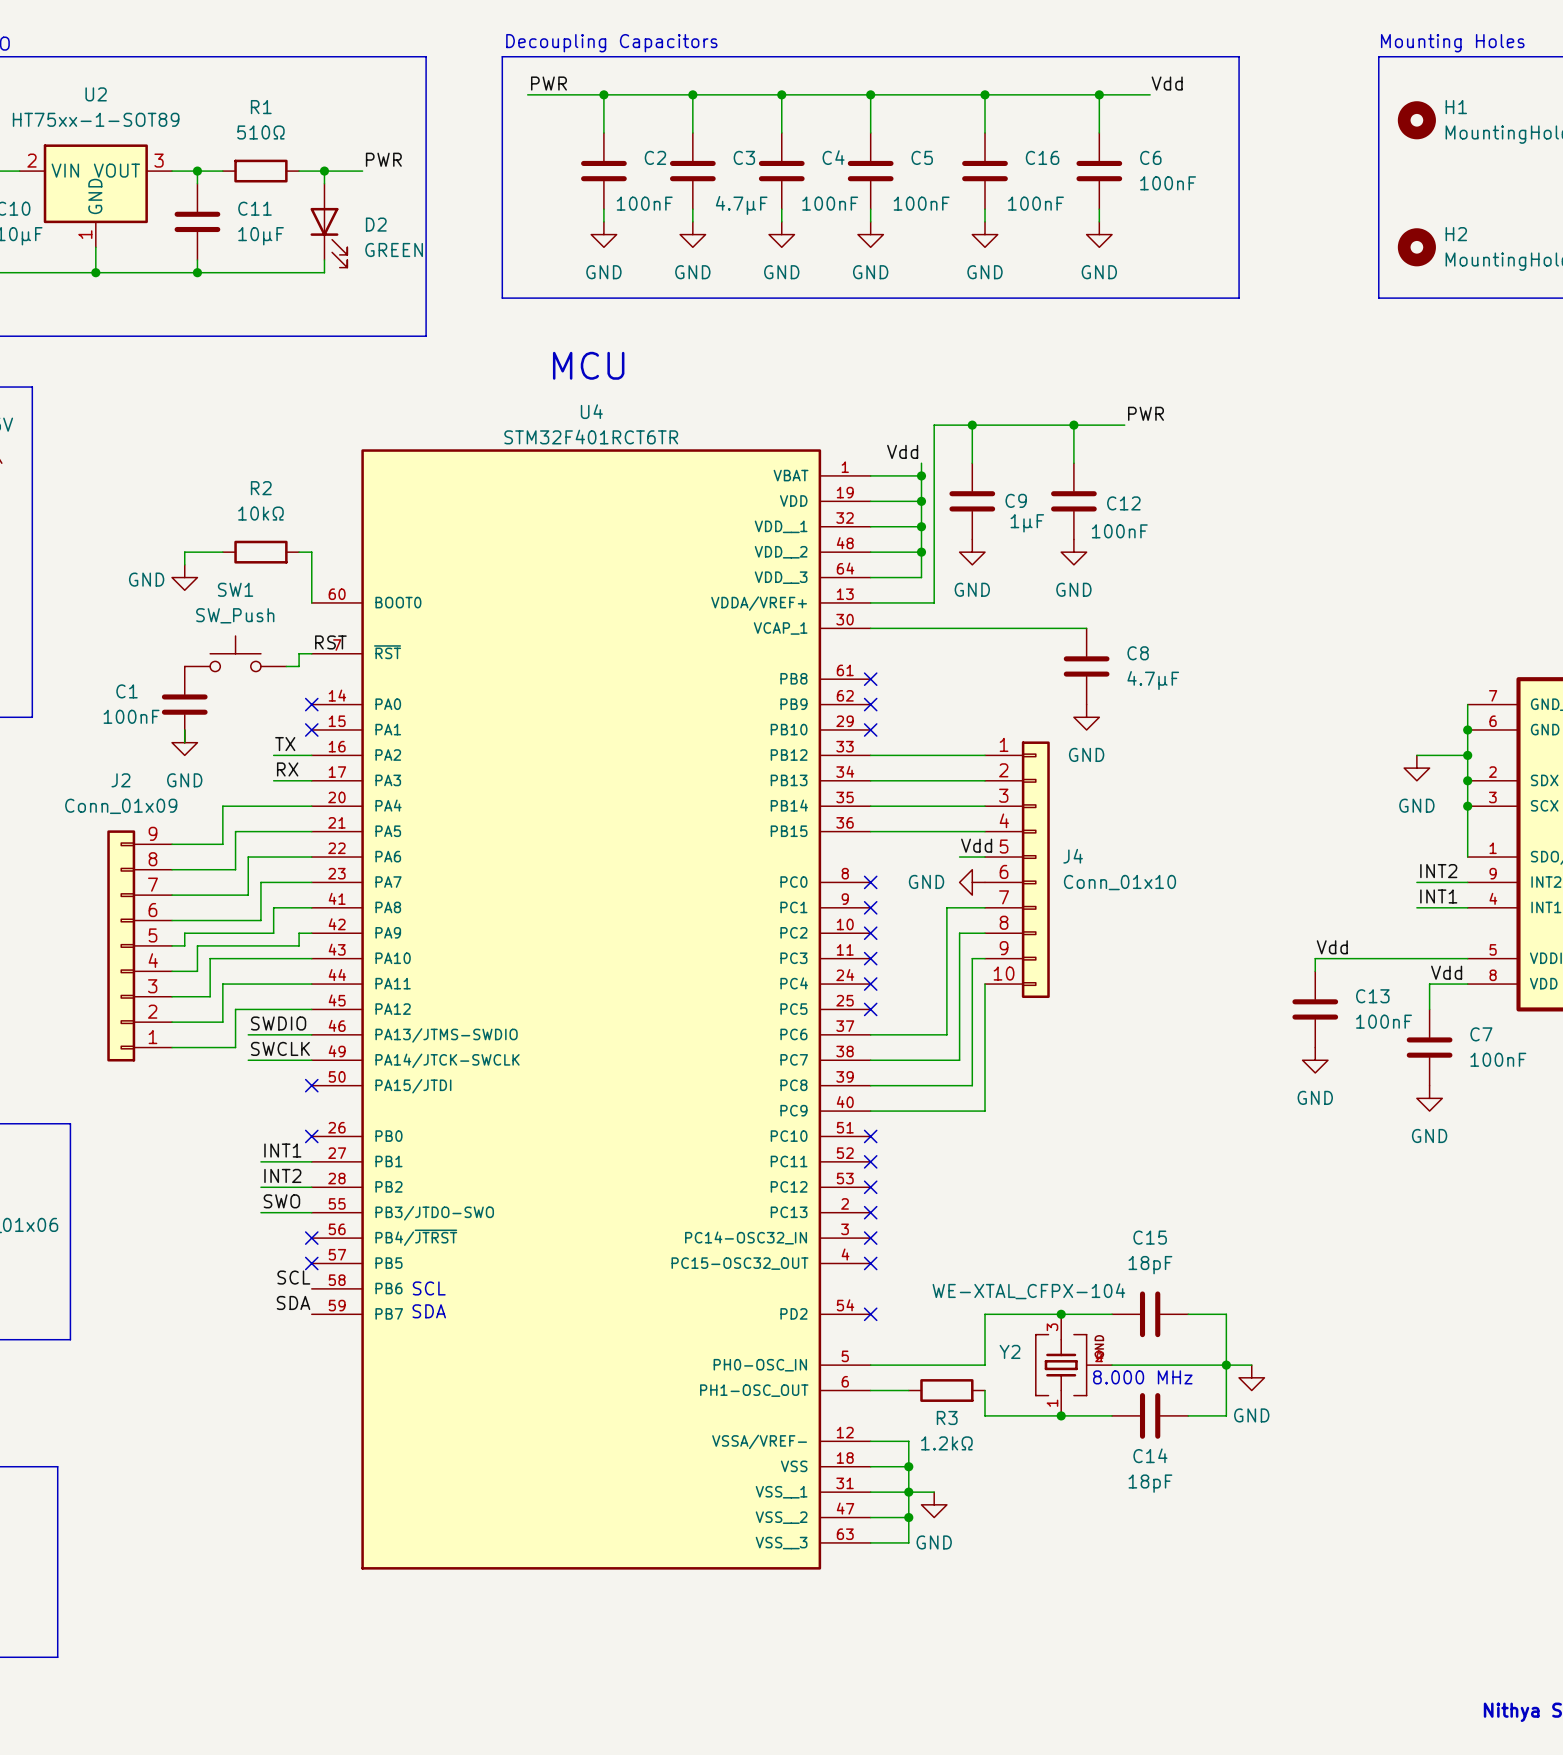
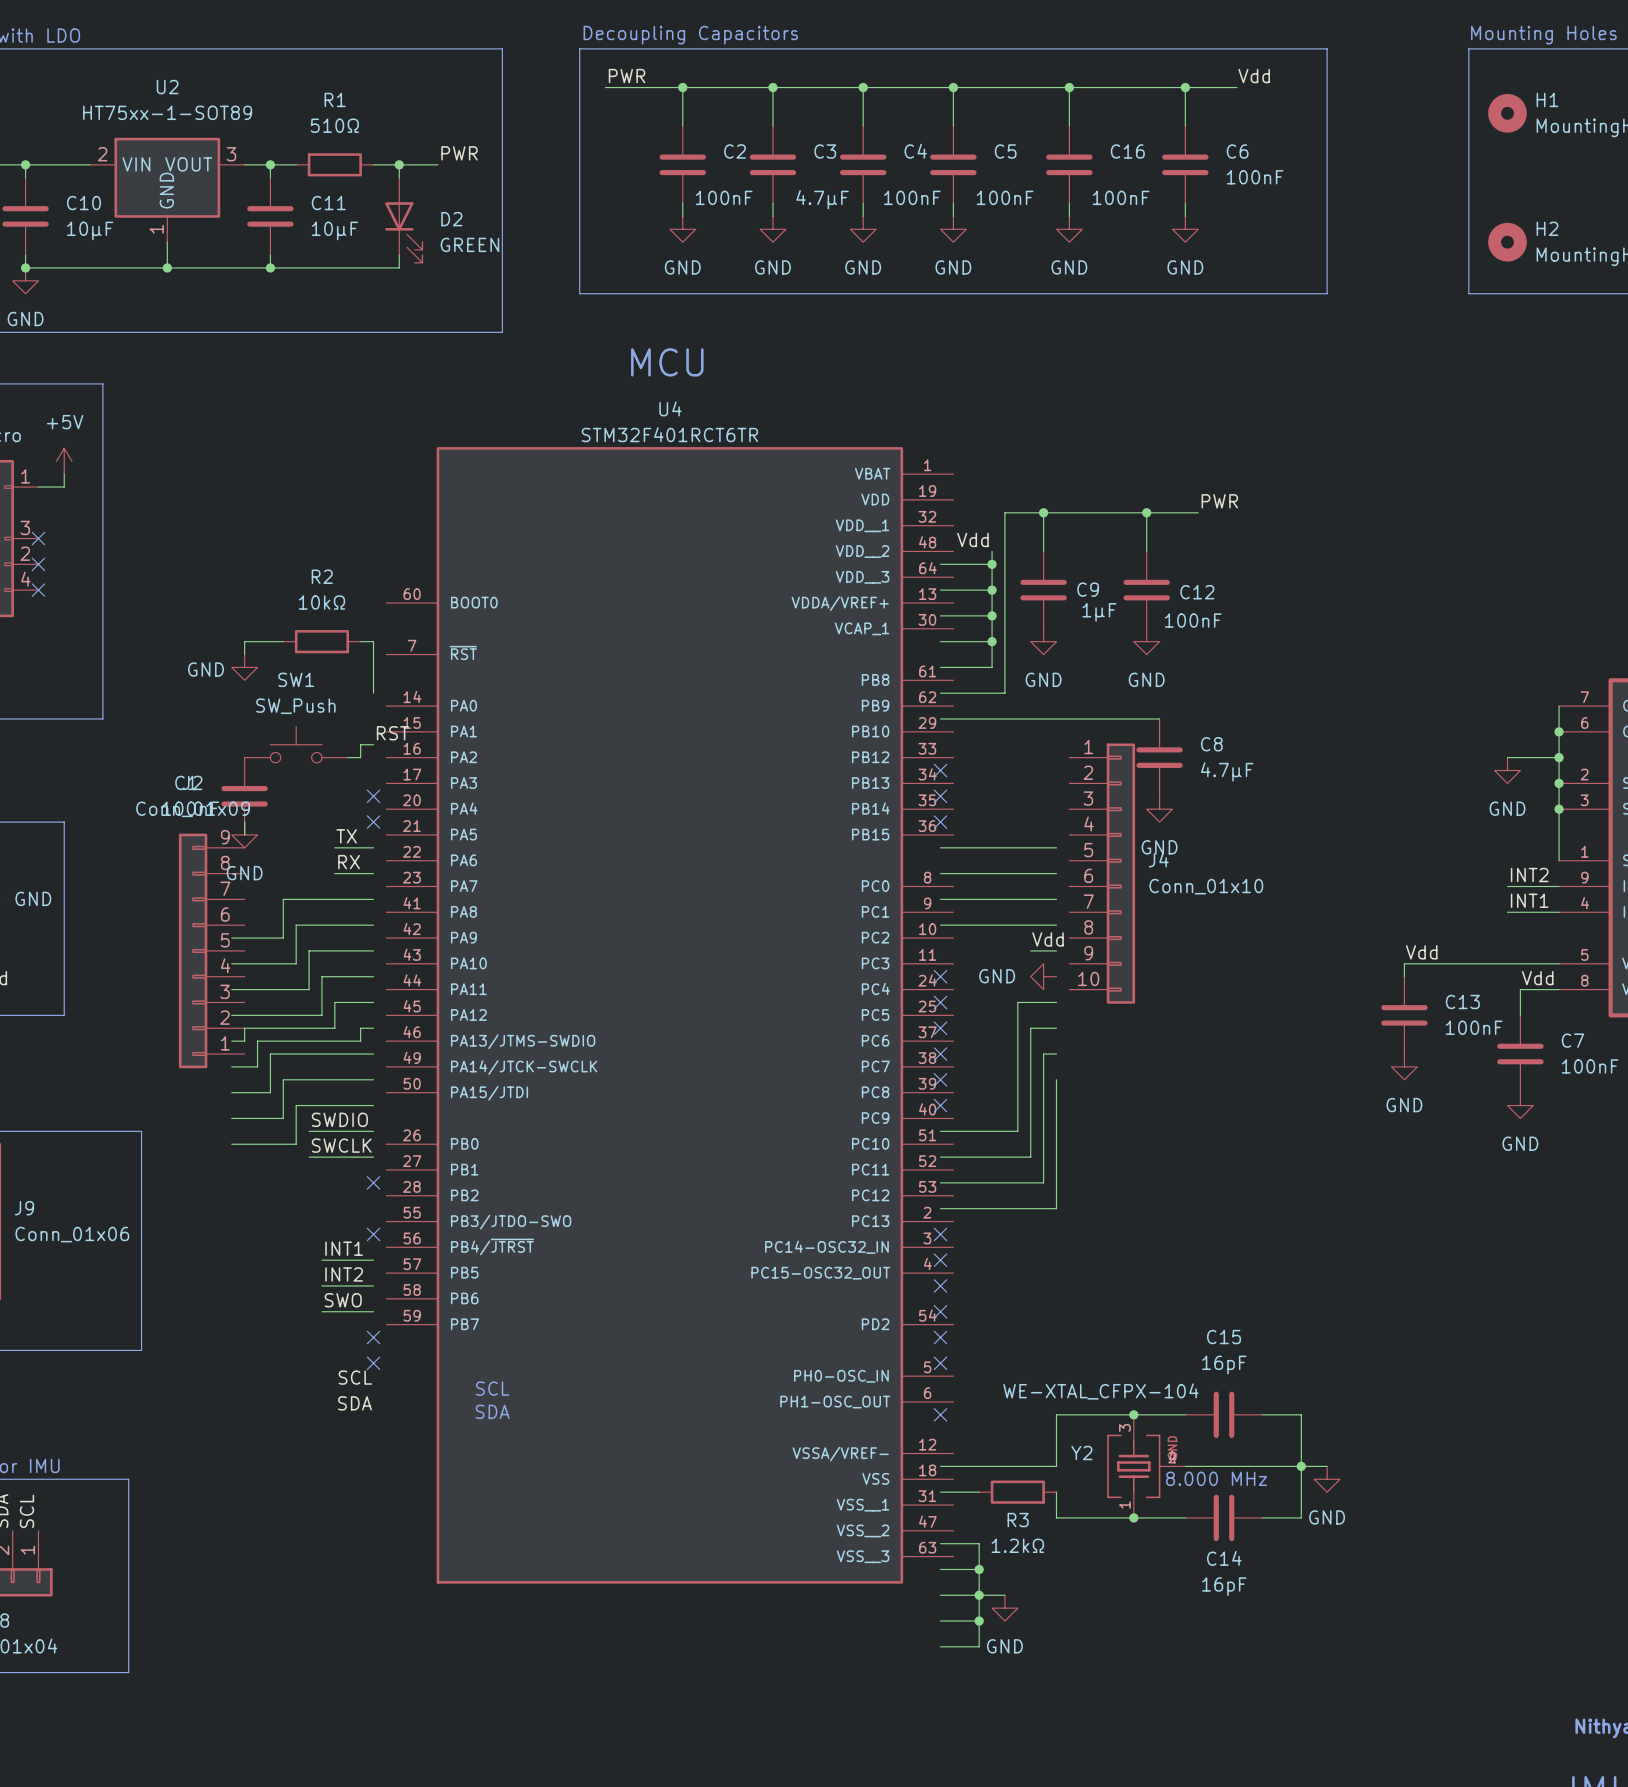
label position: PWR (1145, 413) -> PWR (1219, 501)
wire: (972, 425) (972, 463) -> (1043, 512) (1043, 551)
junction: (972, 425) -> none
wire: (1073, 425) (1073, 463) -> (1146, 512) (1146, 551)
junction: (1073, 425) -> none
wire: (1124, 425) (934, 425) (934, 602) (870, 602) -> none
label position: Vdd (902, 451) -> Vdd (972, 539)
wire: (921, 463) (921, 514) -> (1198, 512) (1004, 512)
wire: (870, 475) (921, 475) -> (940, 564) (992, 564)
junction: (921, 475) -> none
wire: (870, 501) (921, 501) -> (940, 590) (992, 590)
junction: (921, 501) -> none
C9 position: (972, 501) -> (1043, 590)
C12 position: (1073, 501) -> (1146, 590)
junction: none -> (1043, 512)
junction: none -> (1146, 512)
wire: (870, 526) (921, 526) -> (940, 615) (992, 615)
junction: (921, 526) -> none
wire: (222, 552) (184, 552) (184, 564) -> (283, 641) (244, 641) (244, 654)
R2 position: (260, 552) -> (321, 641)
wire: (299, 552) (311, 552) (311, 602) -> none
wire: (870, 552) (921, 552) -> (940, 641) (992, 641)
wire: none -> (992, 551) (992, 667) (940, 667)
junction position: (921, 552) -> (992, 564)
power symbol: GND (972, 552) -> none
power symbol: GND (1073, 552) -> none
power symbol: GND (184, 577) -> none
wire: (870, 577) (921, 577) -> (940, 693) (1004, 693) (1004, 577)
junction: none -> (992, 590)
junction: none -> (992, 615)
wire: (870, 628) (1086, 628) -> (940, 718) (1159, 718)
junction: none -> (992, 641)
power symbol: none -> GND (1043, 641)
power symbol: none -> GND (1146, 641)
label position: RST (330, 642) -> RST (392, 733)
SW1 position: (235, 653) -> (296, 744)
wire: (299, 653) (311, 653) -> (373, 654) (373, 641) (360, 641)
power symbol: none -> GND (244, 667)
wire: (286, 666) (299, 666) -> (373, 693) (373, 667)
C8 position: (1086, 666) -> (1159, 757)
no-connect mark: (870, 679) -> none
C1 position: (184, 704) -> (244, 796)
no-connect mark: (311, 704) -> none
no-connect mark: (870, 704) -> none
power symbol: GND (1086, 717) -> none
wire: (184, 729) (184, 742) -> (244, 822) (244, 834)
no-connect mark: (311, 729) -> none
no-connect mark: (870, 729) -> none
power symbol: GND (184, 742) -> none
label position: TX (285, 744) -> TX (346, 836)
wire: (286, 755) (311, 755) -> (360, 757) (360, 744) (373, 744)
wire: (870, 755) (985, 755) -> (940, 847) (1056, 847)
no-connect mark: none -> (940, 770)
label position: RX (287, 769) -> RX (349, 862)
wire: (273, 780) (311, 780) -> (334, 873) (373, 873)
wire: (870, 780) (985, 780) -> (940, 873) (1056, 873)
no-connect mark: none -> (373, 796)
no-connect mark: none -> (940, 796)
wire: (311, 806) (222, 806) (222, 844) (172, 844) -> none
wire: (870, 806) (985, 806) -> (940, 899) (1056, 899)
power symbol: none -> GND (1159, 809)
no-connect mark: none -> (373, 822)
no-connect mark: none -> (940, 822)
power symbol: none -> GND (244, 834)
wire: (311, 831) (235, 831) (235, 869) (172, 869) -> none
wire: (870, 831) (985, 831) -> (940, 925) (1056, 925)
wire: none -> (334, 847) (373, 847)
label position: Vdd (976, 845) -> Vdd (1047, 939)
wire: (311, 857) (248, 857) (248, 895) -> (373, 899) (321, 899)
wire: (959, 857) (985, 857) -> (1030, 950) (1056, 950)
wire: (311, 882) (260, 882) (260, 920) -> (373, 925) (334, 925)
no-connect mark: (870, 882) -> none
power symbol: GND (972, 882) -> none
wire: (172, 895) (210, 895) -> (283, 938) (283, 899)
wire: (311, 907) (273, 907) (273, 933) (210, 933) -> none
no-connect mark: (870, 907) -> none
wire: (985, 907) (946, 907) (946, 1022) -> (1056, 1028) (1030, 1028)
wire: (172, 920) (222, 920) -> (296, 963) (296, 925)
wire: (184, 933) (184, 945) (172, 945) -> (257, 938) (231, 938)
wire: (311, 933) (299, 933) (299, 945) -> none
no-connect mark: (870, 933) -> none
wire: (985, 933) (959, 933) (959, 1047) -> (1056, 1054) (1043, 1054)
wire: (235, 945) (197, 945) (197, 971) (172, 971) -> (309, 950) (309, 989)
wire: (210, 958) (210, 996) (172, 996) -> (283, 963) (231, 963)
wire: (222, 958) (311, 958) -> none
no-connect mark: (870, 958) -> none
wire: (985, 958) (972, 958) (972, 1072) -> none
no-connect mark: none -> (940, 976)
power symbol: none -> GND (1043, 976)
wire: (222, 984) (222, 1022) -> (296, 989) (231, 989)
wire: (235, 984) (311, 984) -> (231, 1015) (309, 1015)
no-connect mark: (870, 984) -> none
wire: (985, 984) (985, 1111) (870, 1111) -> none
wire: none -> (373, 1002) (334, 1002) (334, 1028) (296, 1028)
no-connect mark: none -> (940, 1002)
wire: none -> (1056, 1002) (1017, 1002) (1017, 1131) (940, 1131)
wire: (235, 1009) (235, 1047) -> (373, 1054) (309, 1054)
wire: (248, 1009) (311, 1009) -> (321, 1015) (321, 976) (373, 976)
no-connect mark: (870, 1009) -> none
wire: none -> (244, 1028) (244, 1041) (231, 1041)
no-connect mark: none -> (940, 1028)
label position: SWDIO (278, 1023) -> SWDIO (339, 1119)
wire: none -> (321, 1041) (257, 1041) (257, 1066) (231, 1066)
wire: (286, 1034) (311, 1034) -> (360, 1041) (360, 1028) (373, 1028)
wire: (870, 1034) (946, 1034) -> (940, 1157) (1030, 1157) (1030, 1041)
wire: (172, 1047) (197, 1047) -> (231, 1092) (270, 1092) (270, 1054)
no-connect mark: none -> (940, 1054)
label position: SWCLK (280, 1048) -> SWCLK (341, 1145)
wire: (248, 1060) (311, 1060) -> (309, 1157) (373, 1157)
wire: (870, 1060) (959, 1060) -> (940, 1182) (1043, 1182) (1043, 1066)
wire: none -> (373, 1079) (283, 1079) (283, 1118) (231, 1118)
no-connect mark: none -> (940, 1079)
no-connect mark: (311, 1085) -> none
wire: (870, 1085) (972, 1085) -> (940, 1208) (1056, 1208) (1056, 1092)
wire: none -> (373, 1105) (296, 1105) (296, 1144) (231, 1144)
no-connect mark: none -> (940, 1105)
wire: none -> (309, 1131) (373, 1131)
no-connect mark: (311, 1136) -> none
no-connect mark: (870, 1136) -> none
label position: INT1 (282, 1150) -> INT1 (344, 1248)
wire: (260, 1161) (311, 1161) -> (321, 1260) (373, 1260)
no-connect mark: (870, 1161) -> none
no-connect mark: none -> (373, 1182)
label position: INT2 (282, 1175) -> INT2 (344, 1274)
wire: (260, 1187) (311, 1187) -> (321, 1285) (373, 1285)
no-connect mark: (870, 1187) -> none
label position: SWO (281, 1201) -> SWO (343, 1300)
wire: (260, 1212) (311, 1212) -> (321, 1311) (373, 1311)
no-connect mark: (870, 1212) -> none
no-connect mark: none -> (940, 1234)
no-connect mark position: (311, 1238) -> (373, 1234)
no-connect mark: (870, 1238) -> none
no-connect mark: none -> (940, 1260)
no-connect mark: (311, 1263) -> none
no-connect mark: (870, 1263) -> none
C15 value: 18pF (1150, 1265) -> 16pF (1224, 1364)
no-connect mark: none -> (940, 1285)
label position: SCL (293, 1277) -> SCL (355, 1377)
text position: SCL (429, 1288) -> SCL (492, 1388)
no-connect mark: none -> (940, 1311)
label position: SDA (293, 1302) -> SDA (355, 1403)
text position: SDA (429, 1311) -> SDA (492, 1411)
no-connect mark: (870, 1314) -> none
junction: (1061, 1314) -> none
wire: (1112, 1314) (985, 1314) (985, 1365) (870, 1365) -> (1185, 1414) (1056, 1414) (1056, 1466) (940, 1466)
C15 position: (1150, 1314) -> (1224, 1414)
wire: (1188, 1314) (1226, 1314) (1226, 1415) (1188, 1415) -> (1262, 1414) (1301, 1414) (1301, 1517) (1262, 1517)
no-connect mark: none -> (373, 1337)
no-connect mark: none -> (940, 1337)
no-connect mark: none -> (373, 1363)
no-connect mark: none -> (940, 1363)
Y2 position: (1073, 1365) -> (1146, 1466)
wire: (1112, 1365) (1251, 1365) -> (1185, 1466) (1327, 1466)
junction: (1226, 1365) -> none
text position: 8.000 MHz (1142, 1377) -> 8.000 MHz (1216, 1478)
power symbol position: GND (1251, 1377) -> GND (1327, 1479)
wire: (870, 1390) (908, 1390) -> (940, 1492) (979, 1492)
R3 position: (946, 1390) -> (1017, 1492)
wire: (985, 1390) (985, 1415) (1112, 1415) -> (1056, 1492) (1056, 1517) (1185, 1517)
no-connect mark: none -> (940, 1414)
junction position: (1061, 1415) -> (1133, 1414)
C14 position: (1150, 1415) -> (1224, 1517)
wire: (870, 1441) (908, 1441) (908, 1542) (870, 1542) -> (940, 1543) (979, 1543) (979, 1646) (940, 1646)
junction: none -> (1301, 1466)
wire: (870, 1466) (908, 1466) -> (940, 1569) (979, 1569)
junction: (908, 1466) -> none
C14 value: 18pF (1150, 1483) -> 16pF (1224, 1586)
wire: (870, 1492) (934, 1492) -> (940, 1595) (1004, 1595)
junction: (908, 1492) -> none
power symbol position: GND (934, 1504) -> GND (1004, 1608)
junction: none -> (1133, 1517)
wire: (870, 1517) (908, 1517) -> (940, 1621) (979, 1621)
junction: (908, 1517) -> none
junction: none -> (979, 1569)
junction: none -> (979, 1595)
junction: none -> (979, 1621)

